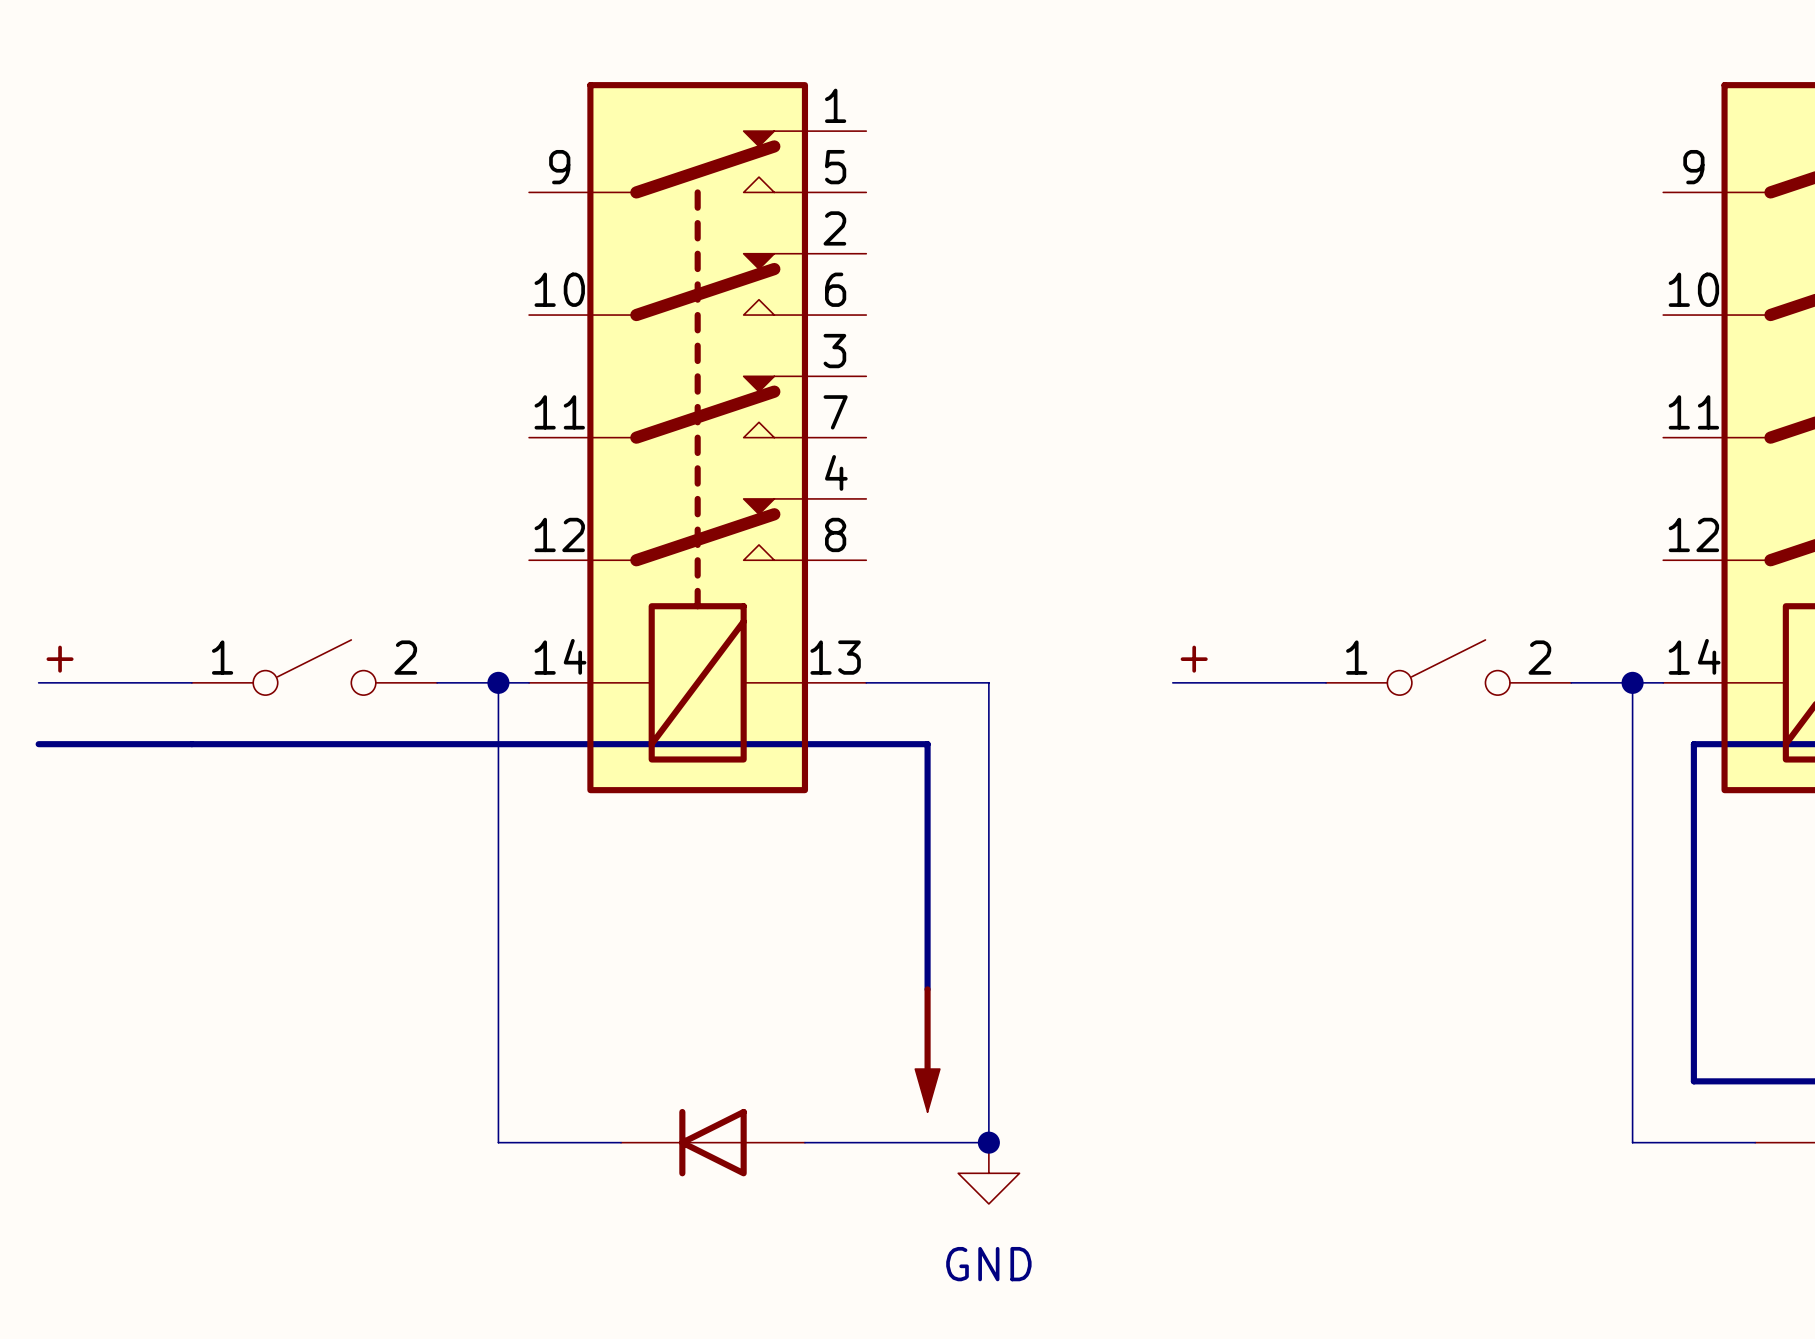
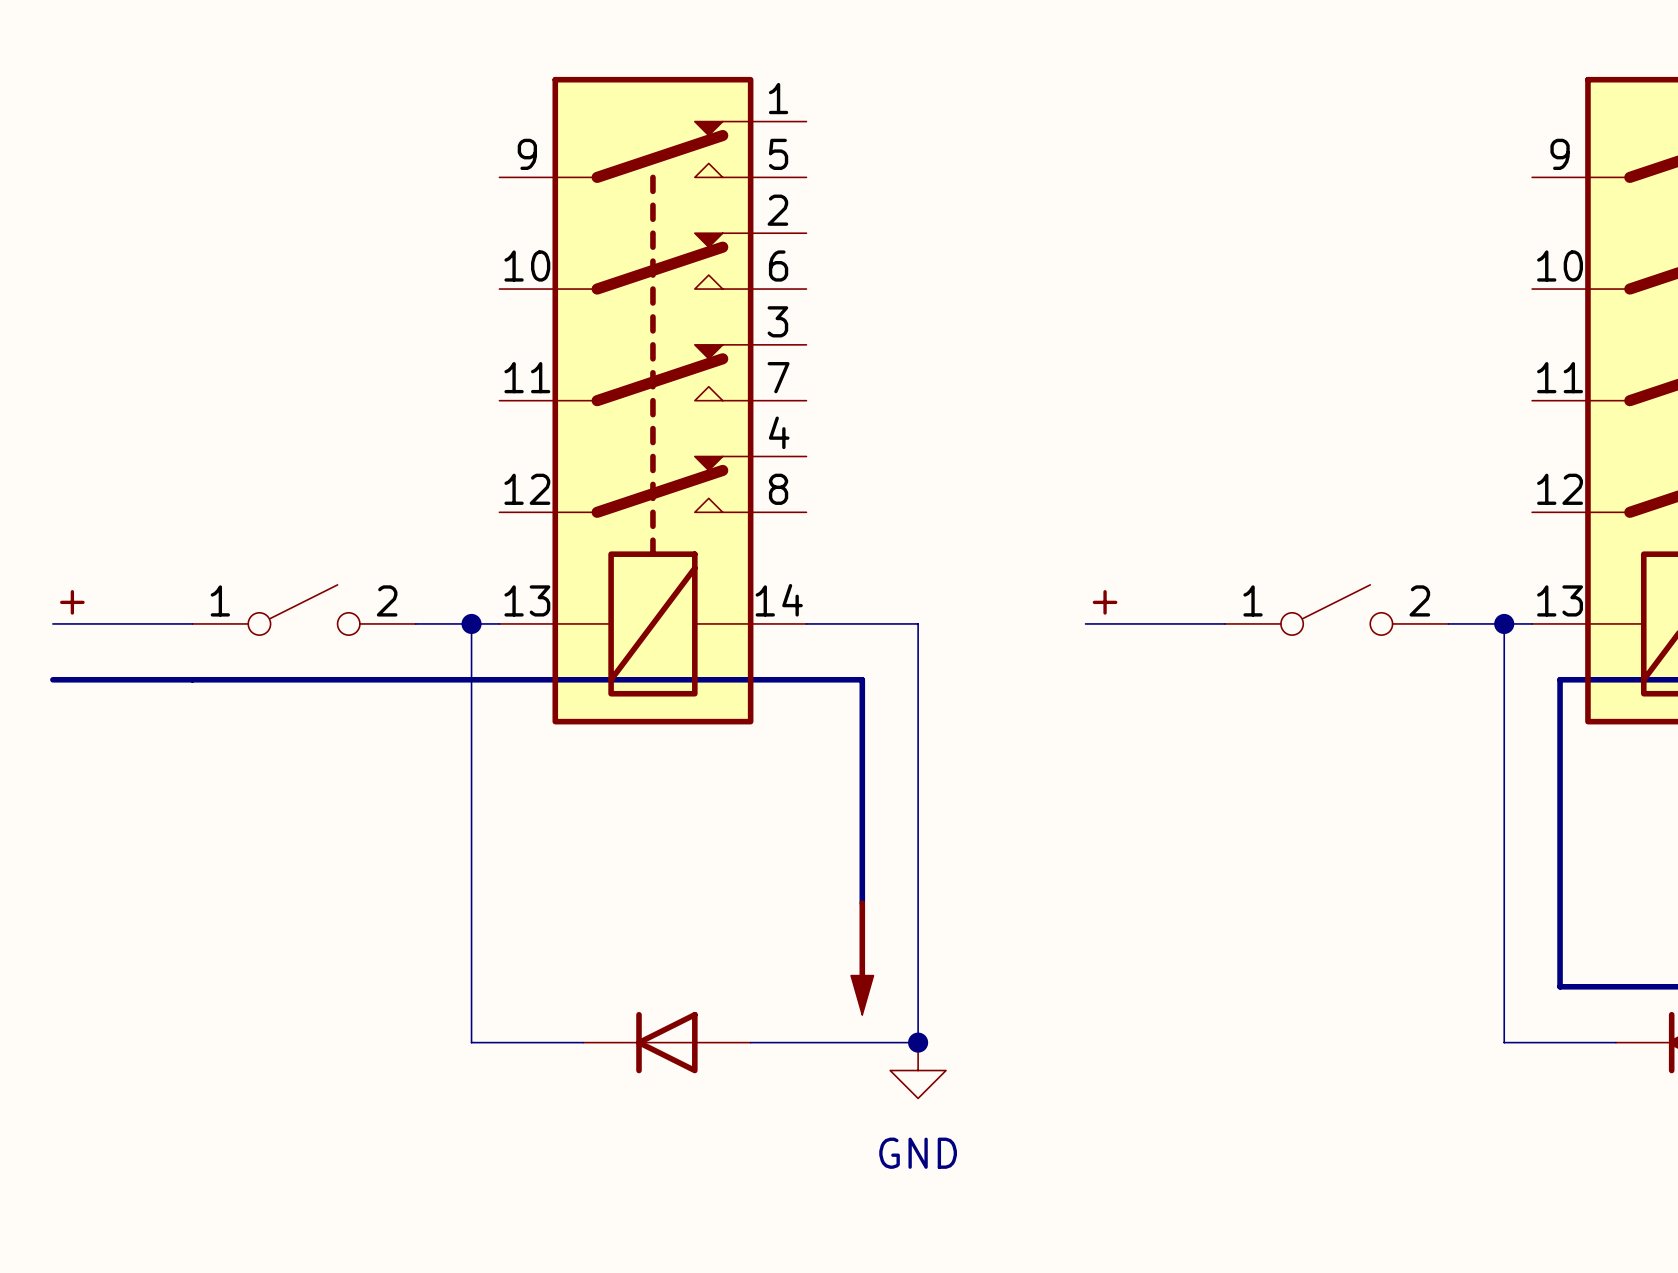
part pin number: 14 (560, 656) -> 13 (527, 600)
part pin number: 14 (1694, 656) -> 13 (1560, 600)
part pin number: 13 (835, 657) -> 14 (779, 600)

